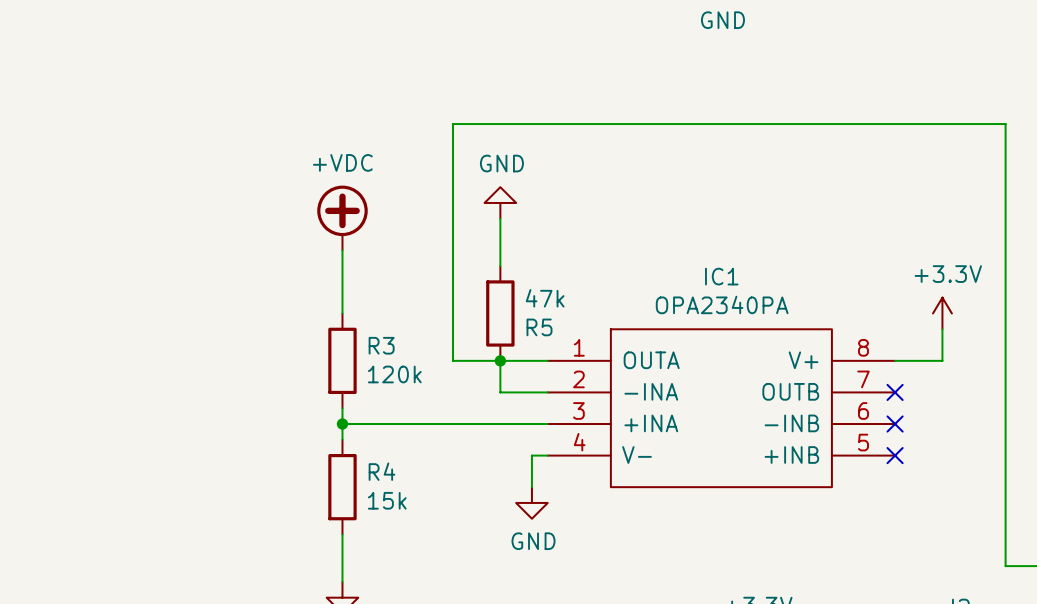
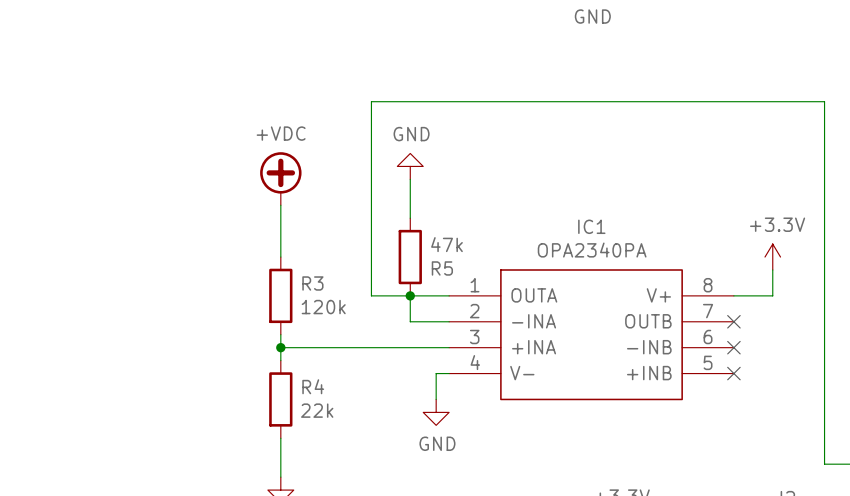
R4 value: 15k (387, 500) -> 22k (317, 410)

